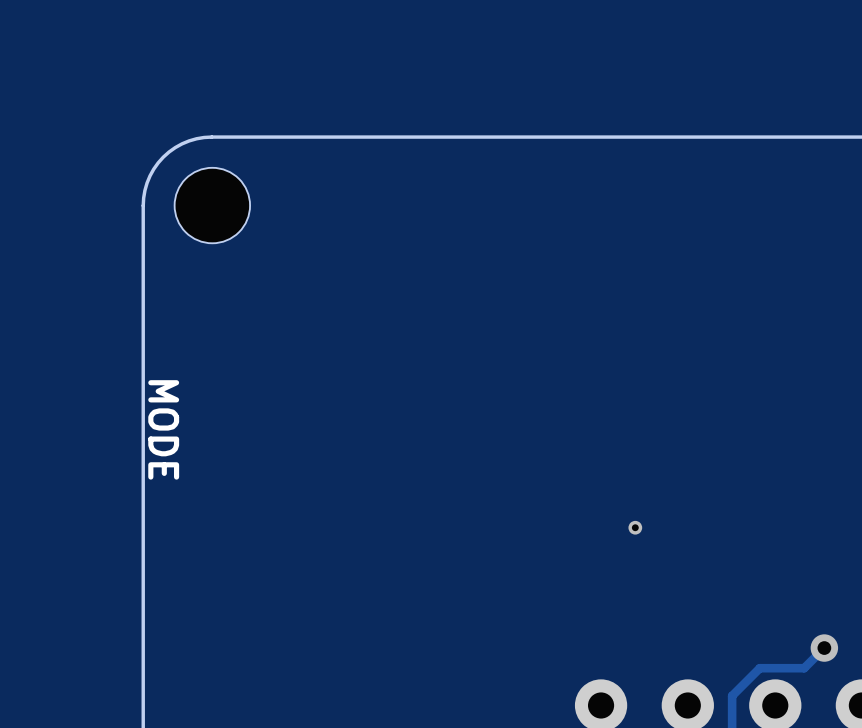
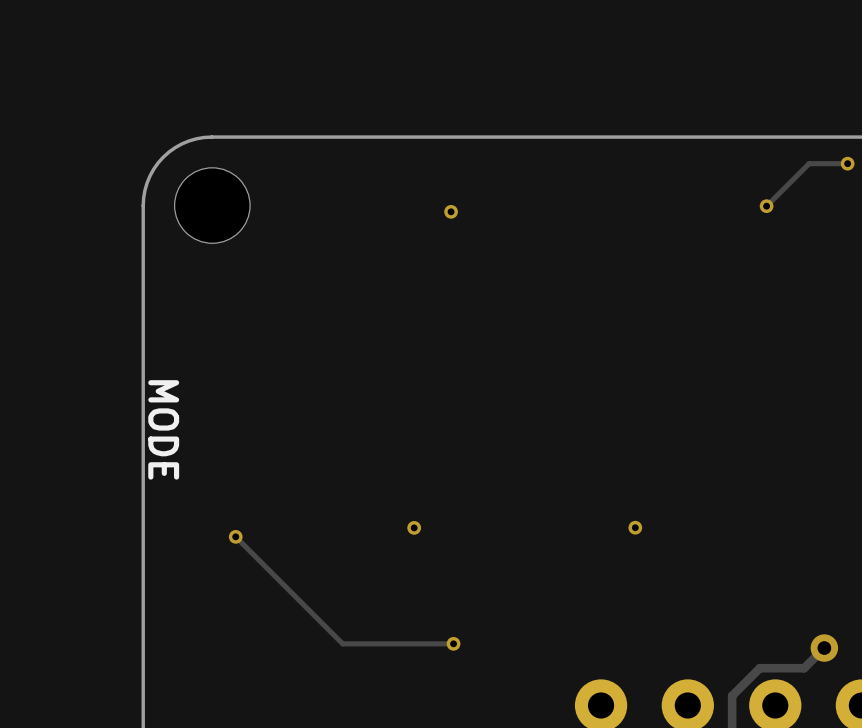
track: none -> (847, 163) (809, 163) (766, 206)
via: none -> (847, 163)
via: none -> (766, 206)
via: none -> (451, 211)
via: none -> (414, 527)
track: none -> (235, 536) (342, 643) (453, 643)
via: none -> (235, 536)
via: none -> (453, 643)

